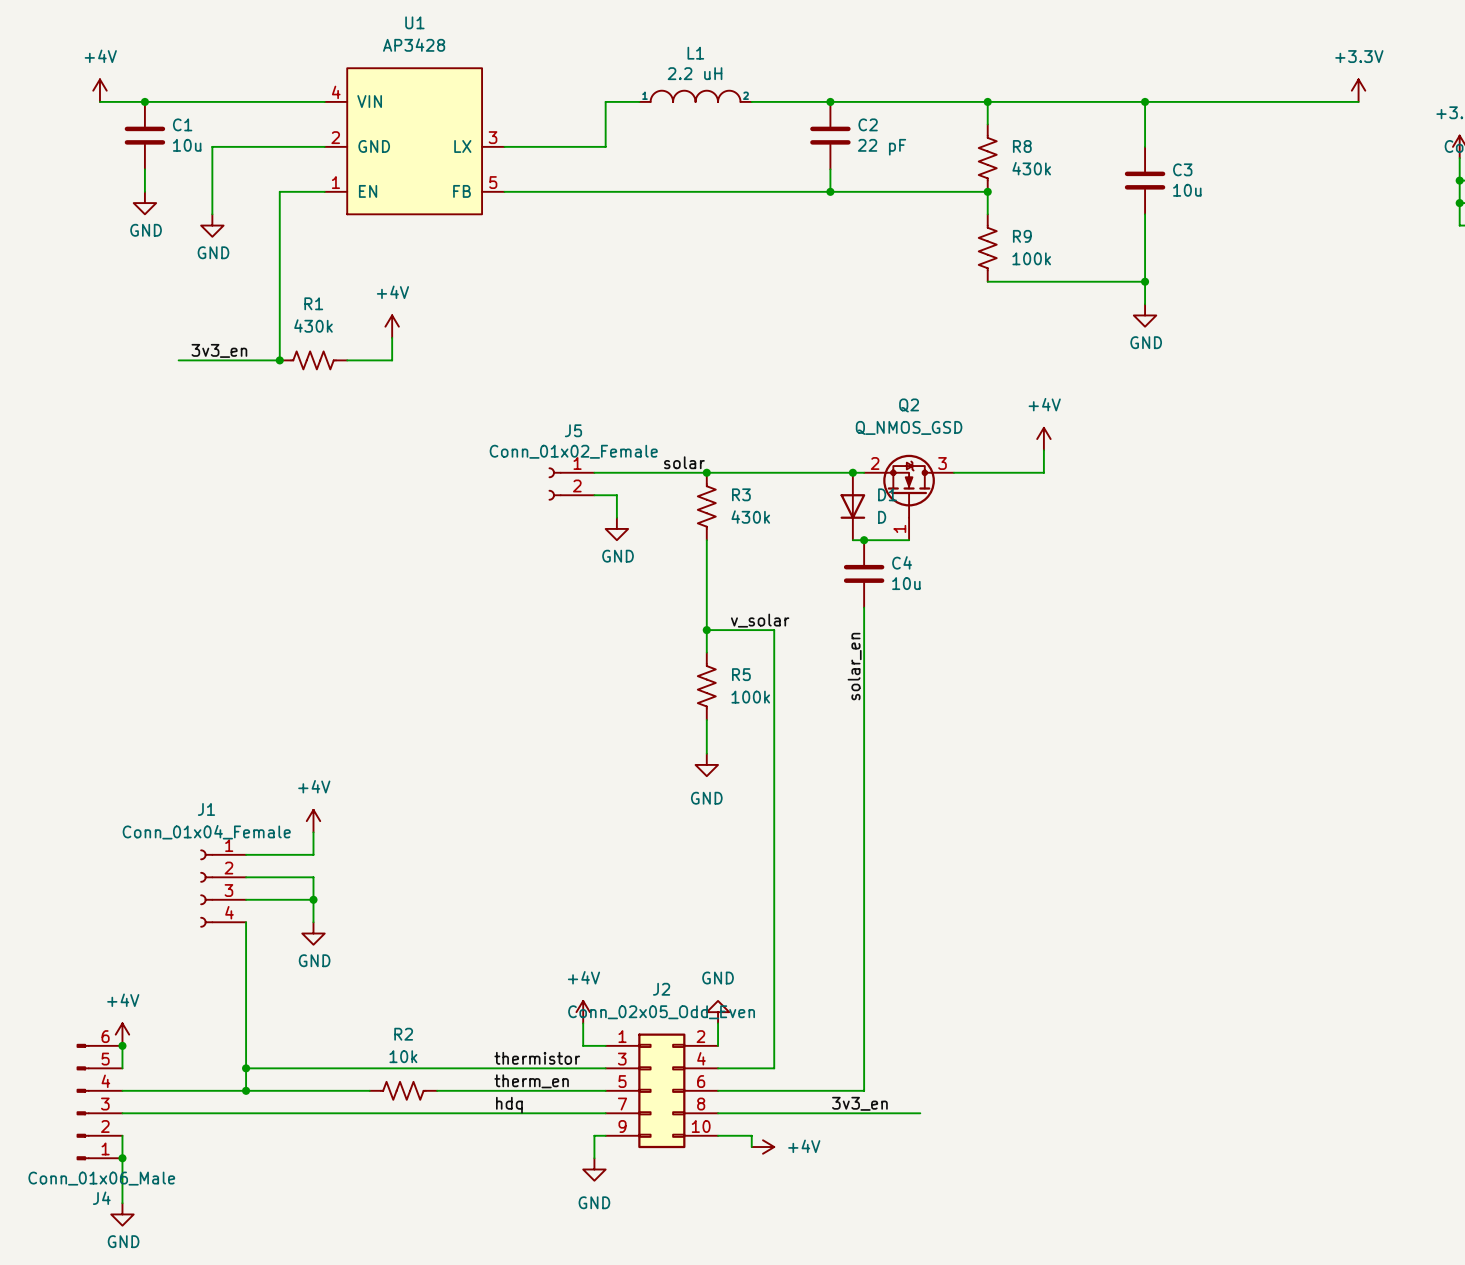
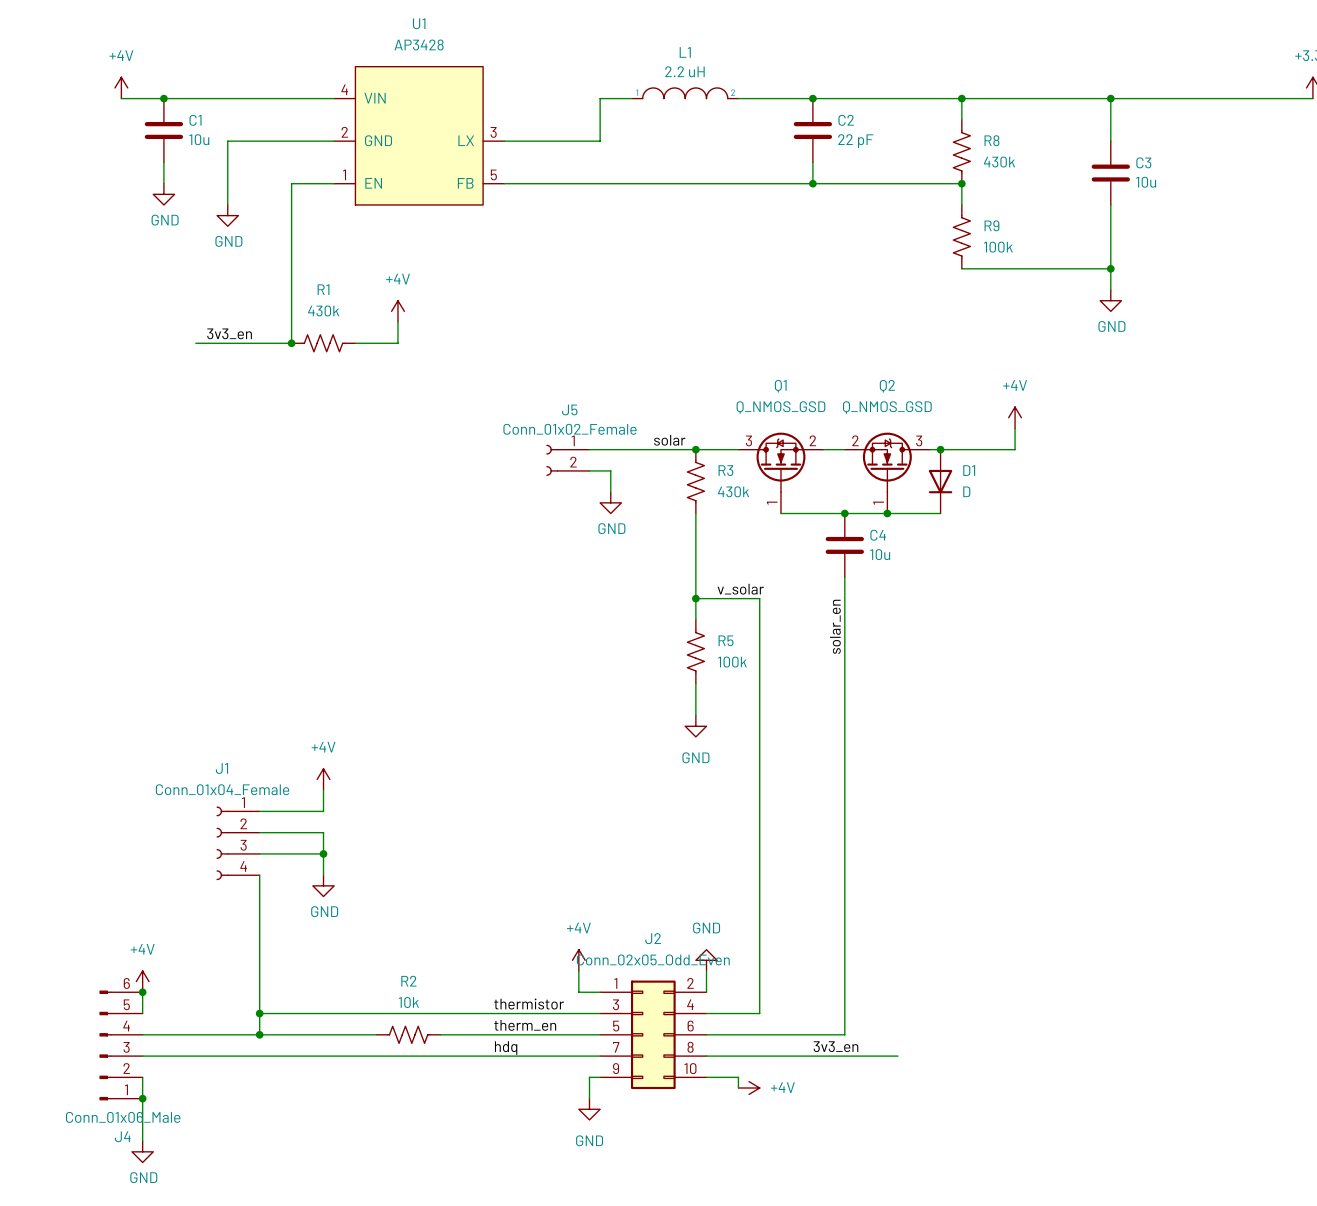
junction: (852, 472) -> none
junction: none -> (940, 449)
Q1: none -> Q_NMOS_GSD (780, 473)
D1 position: (852, 506) -> (940, 481)
wire: none -> (780, 513) (834, 513)
wire: none -> (887, 513) (940, 513)
junction: none -> (887, 513)

